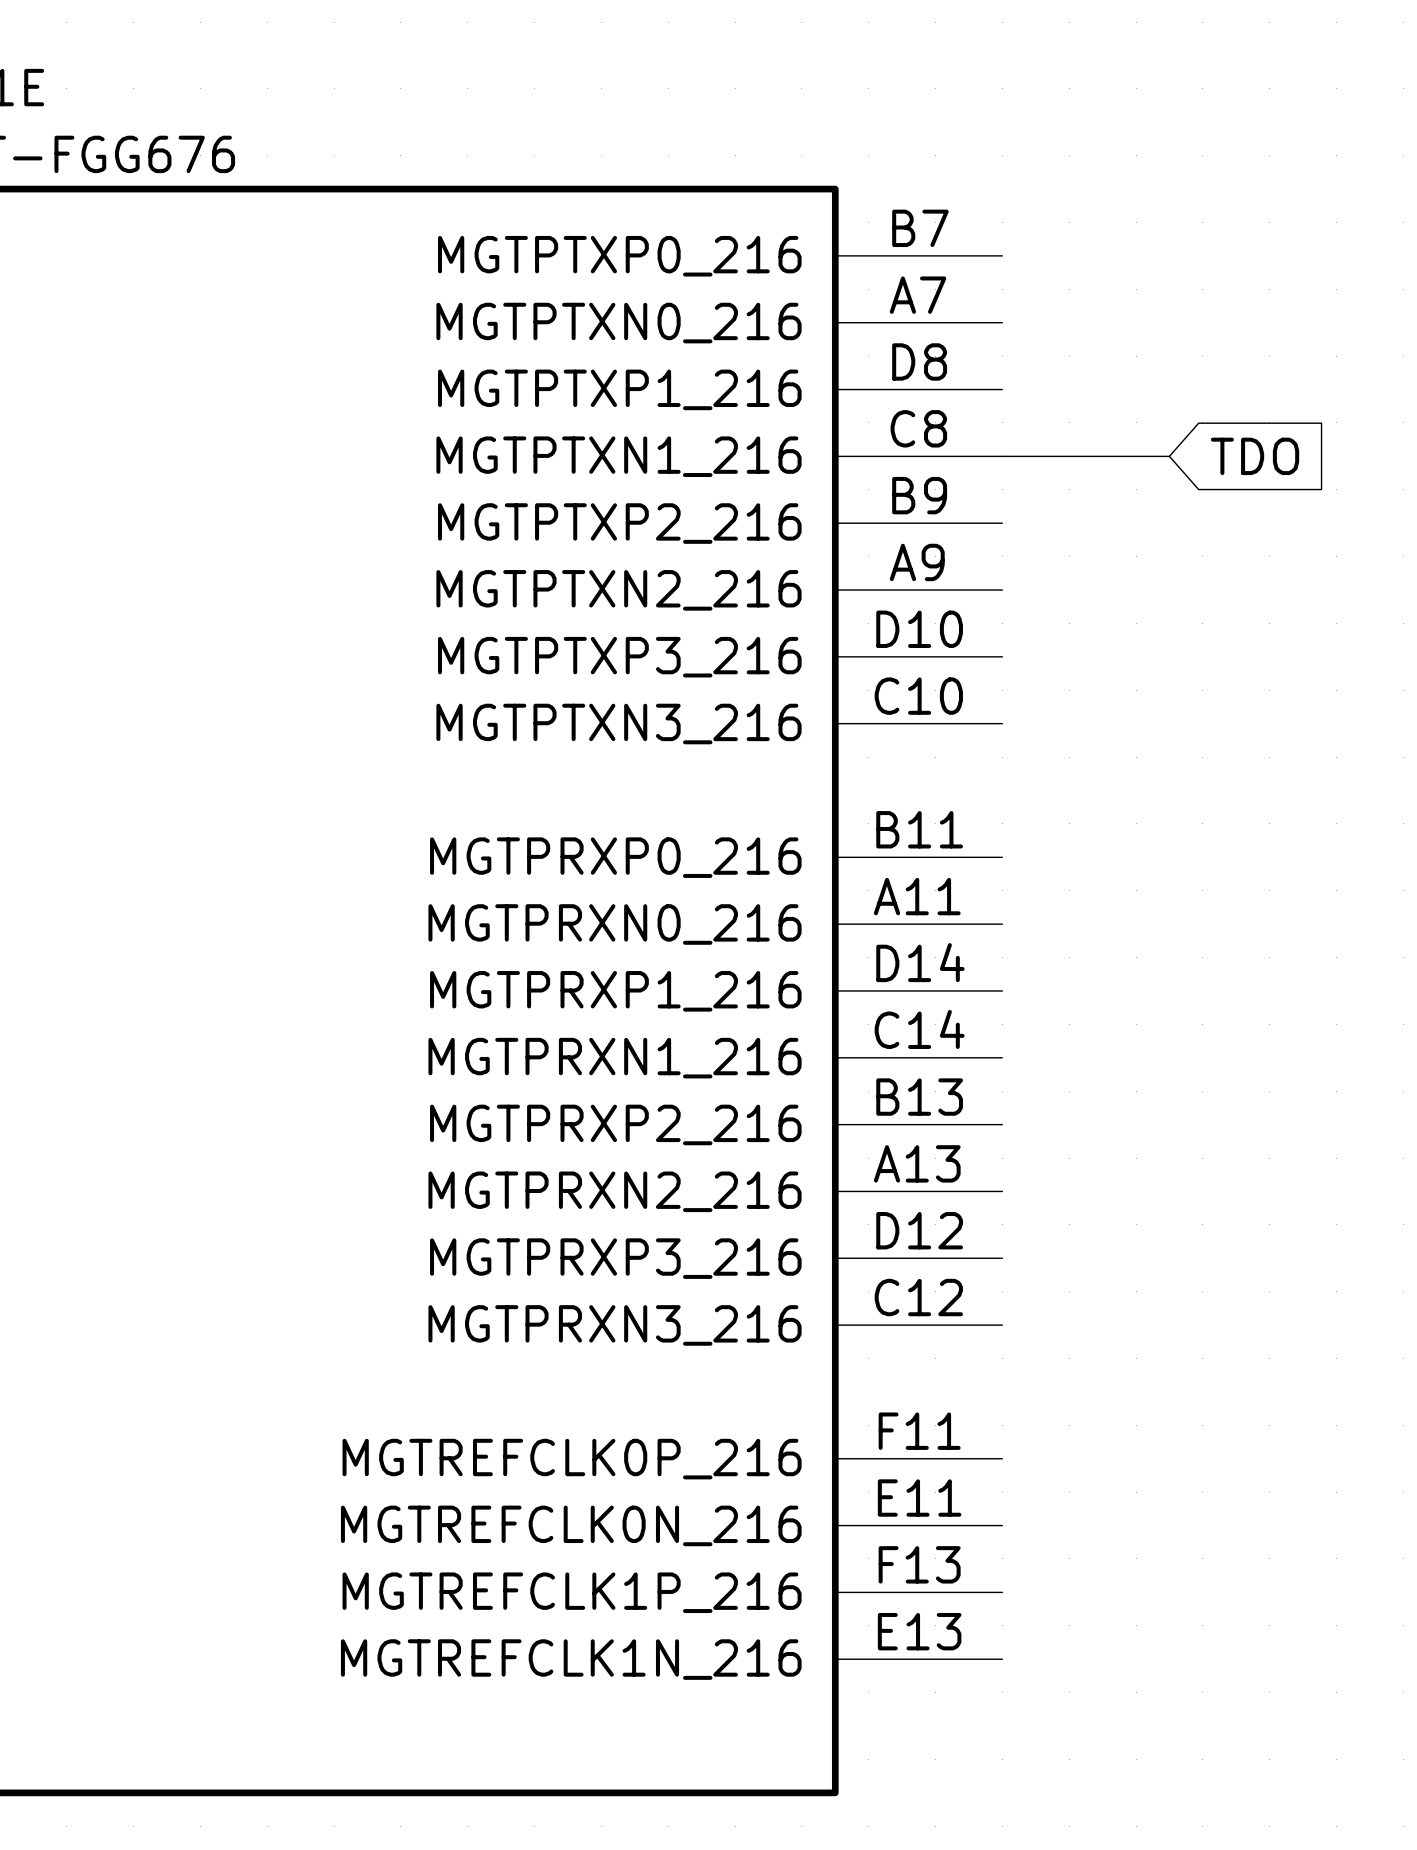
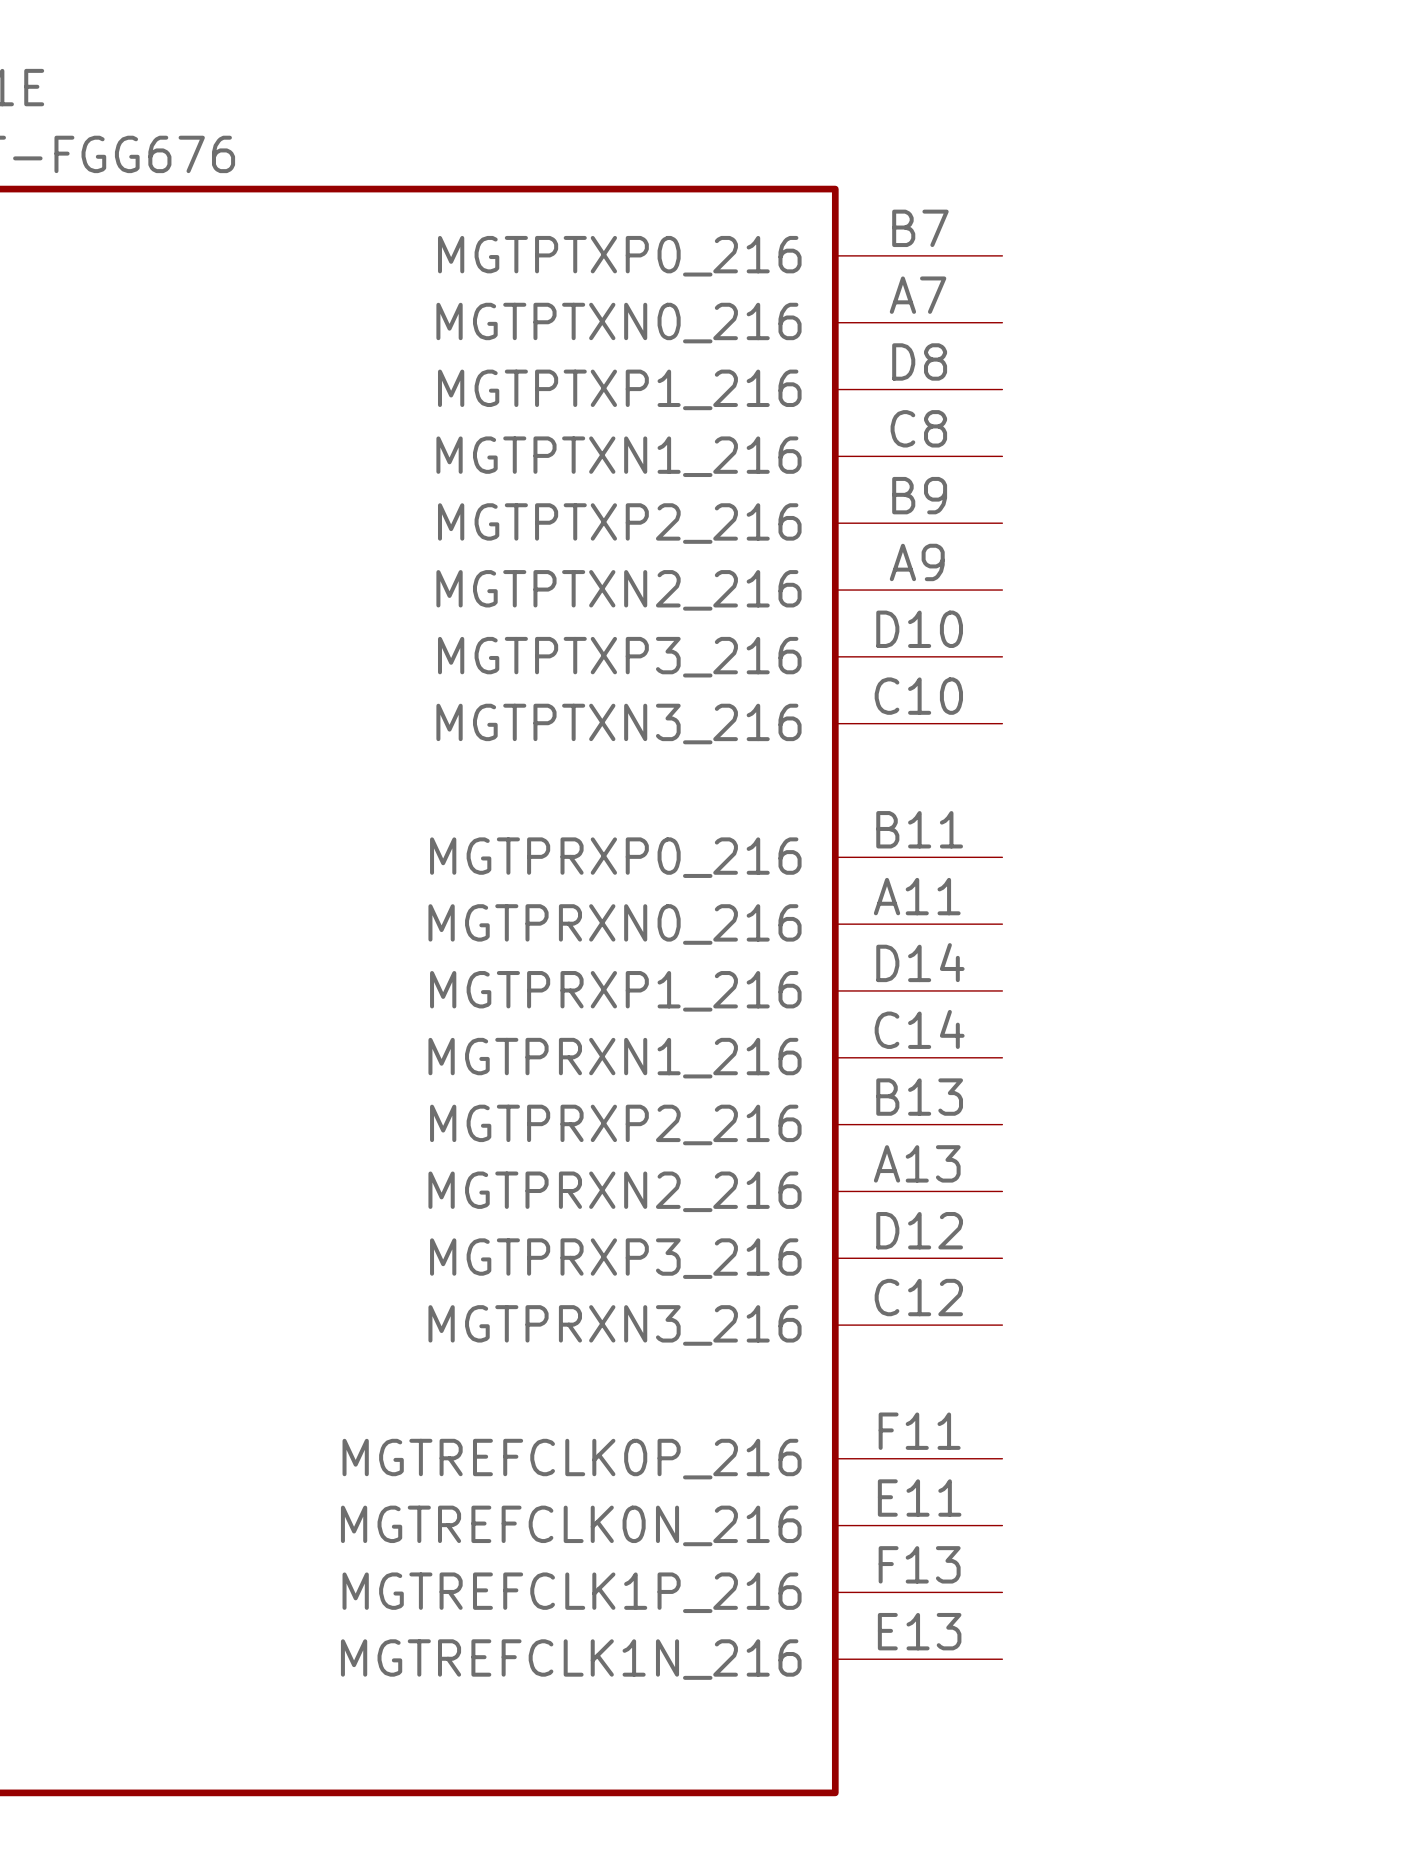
wire: (1002, 456) (1169, 456) -> none
global label: TDO (1255, 456) -> none

